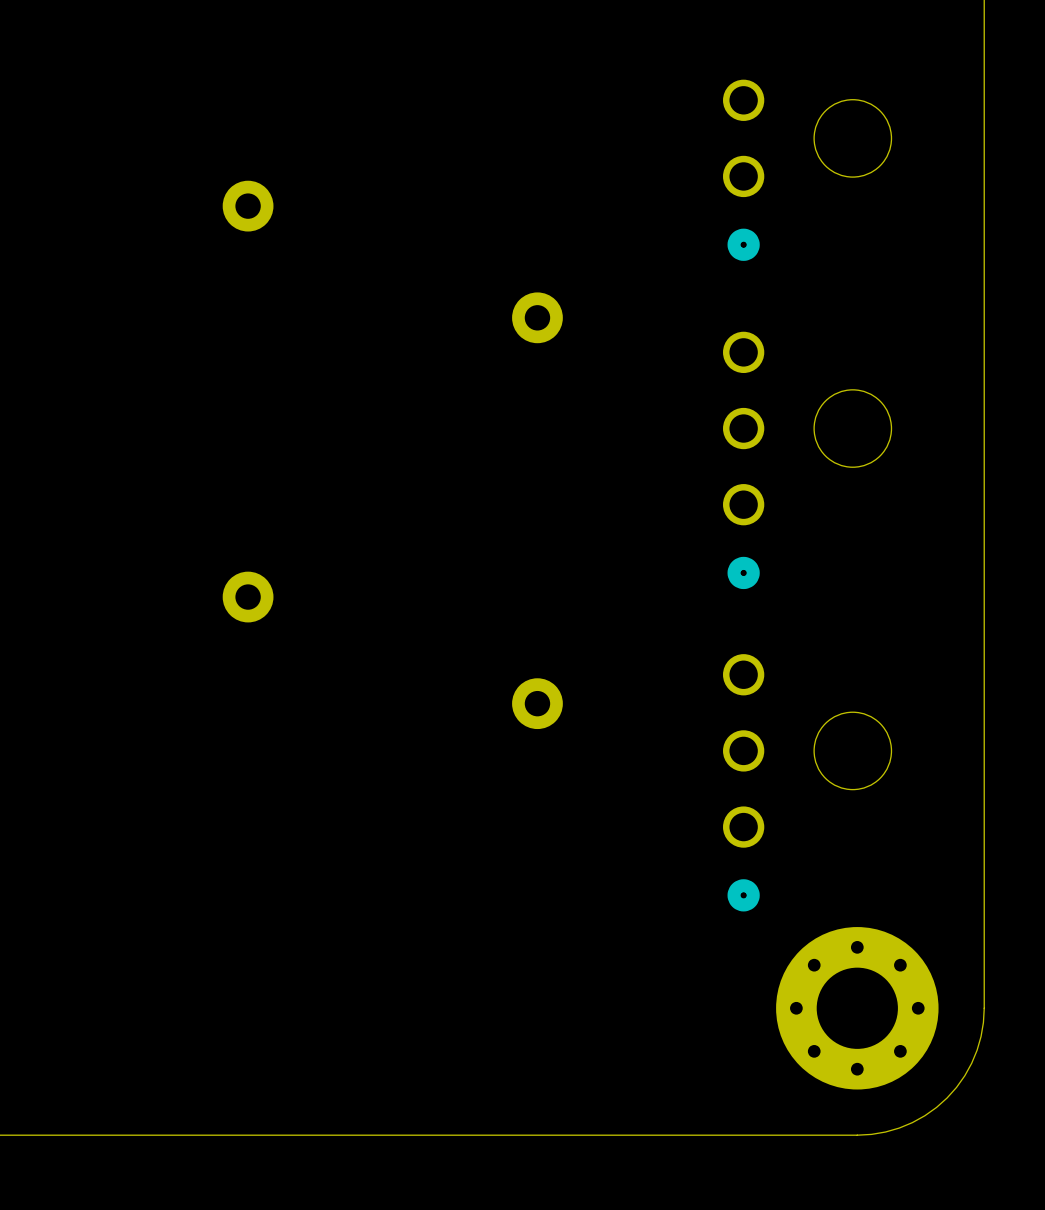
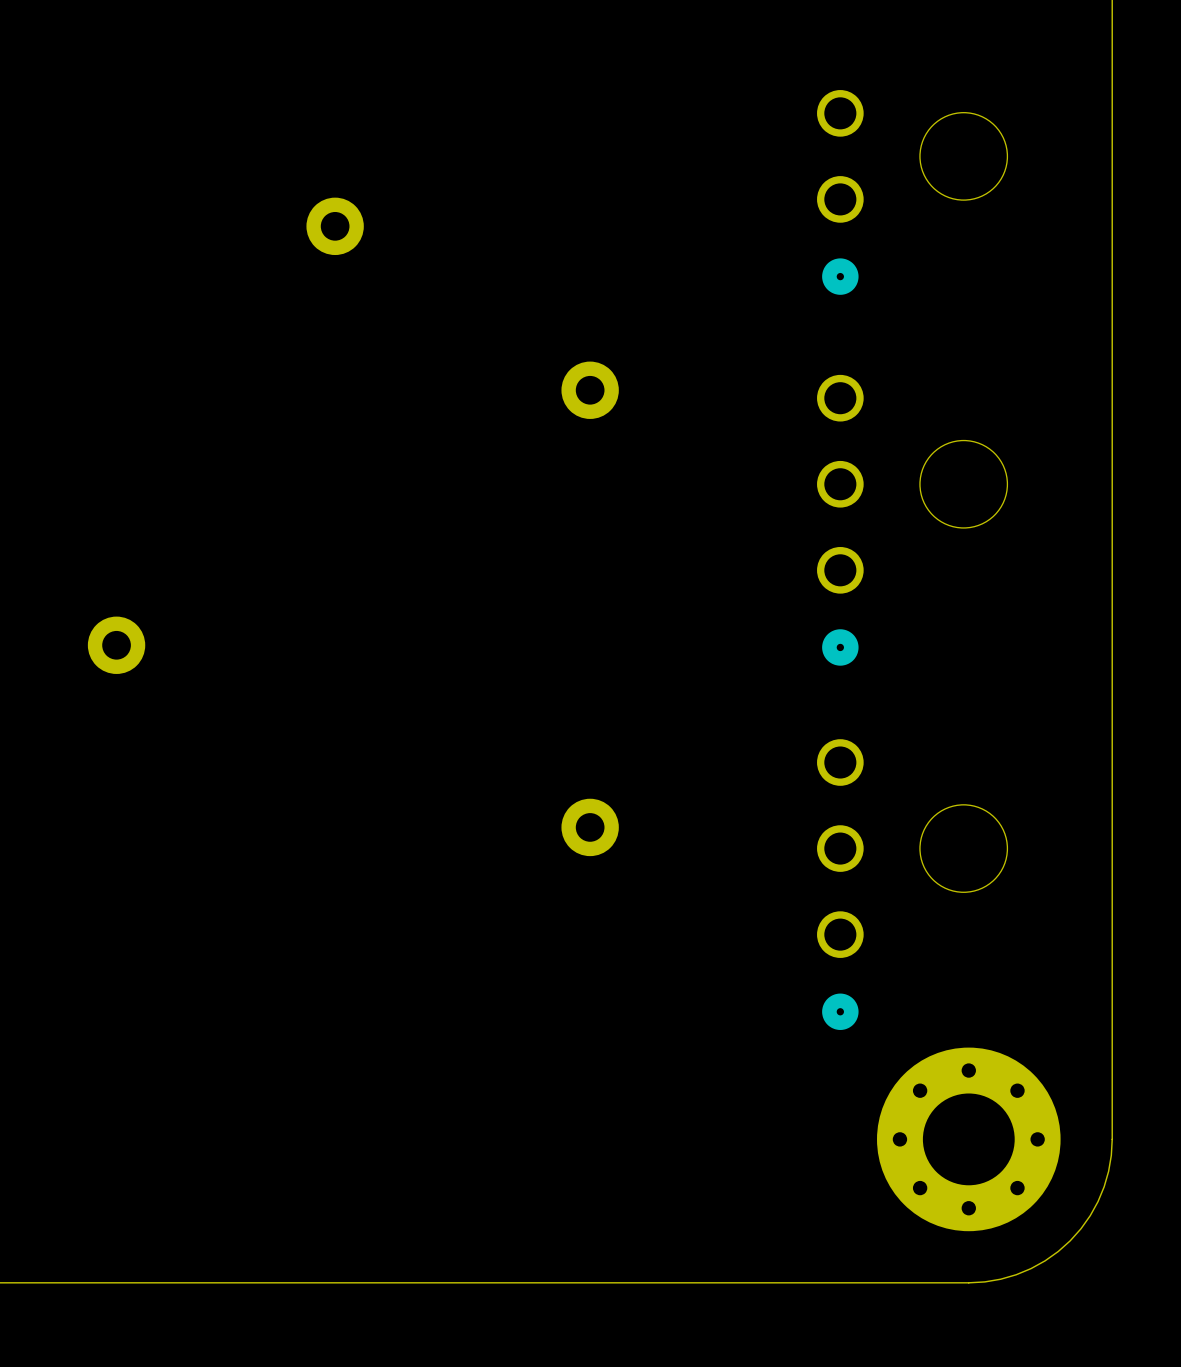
part position: (248, 206) -> (335, 226)
part position: (537, 317) -> (590, 390)
part position: (248, 597) -> (116, 645)
part position: (537, 703) -> (590, 827)

